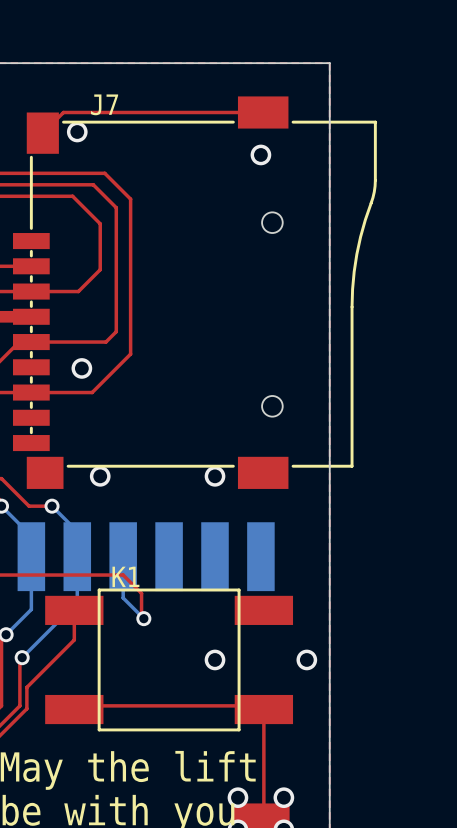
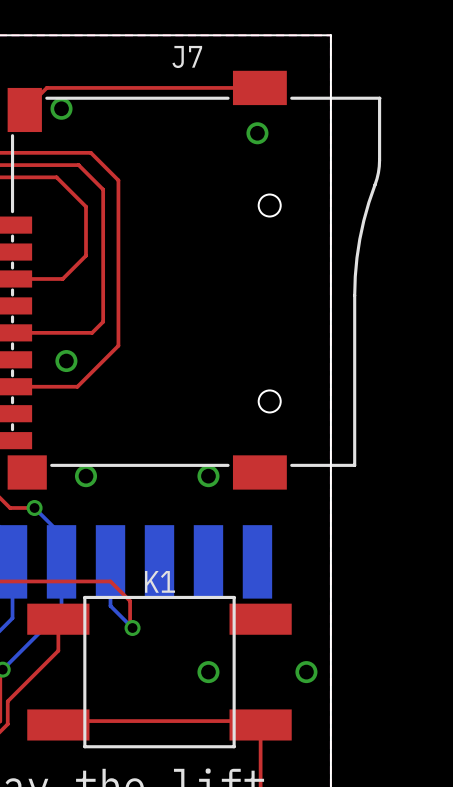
J7 name position: J7 (104, 104) -> J7 (187, 56)
K1 name position: K1 (125, 576) -> K1 (160, 581)

